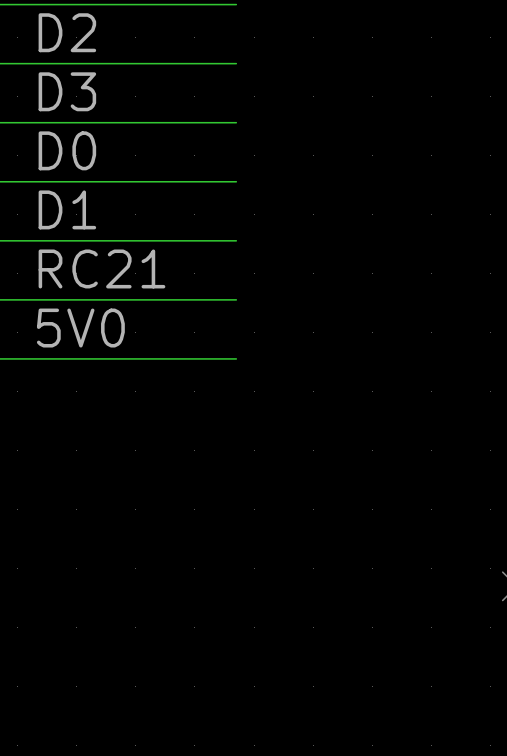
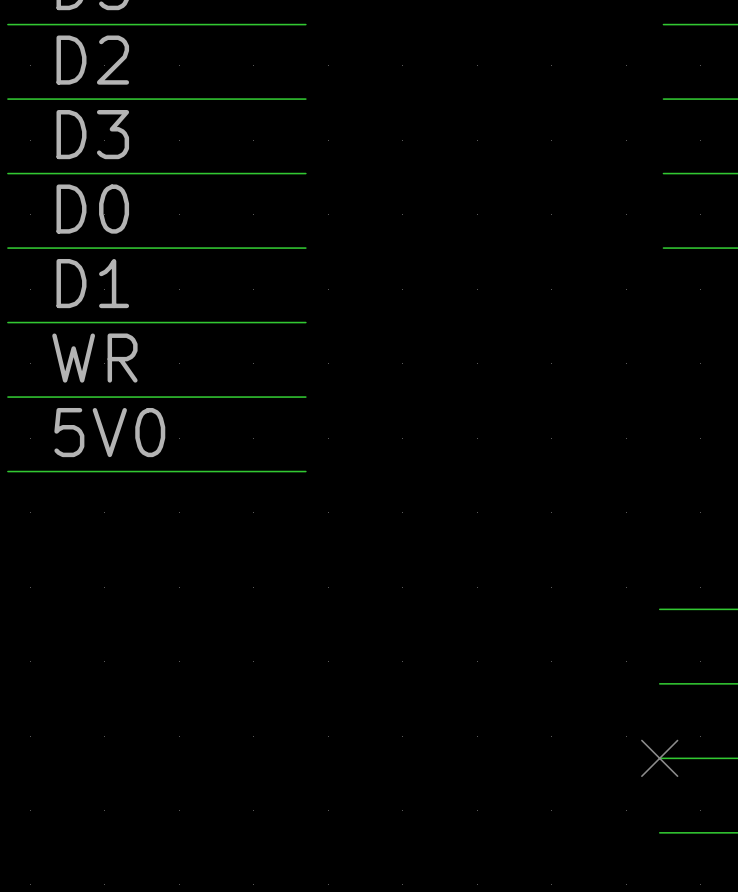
label: RC21 (101, 268) -> WR (94, 358)

